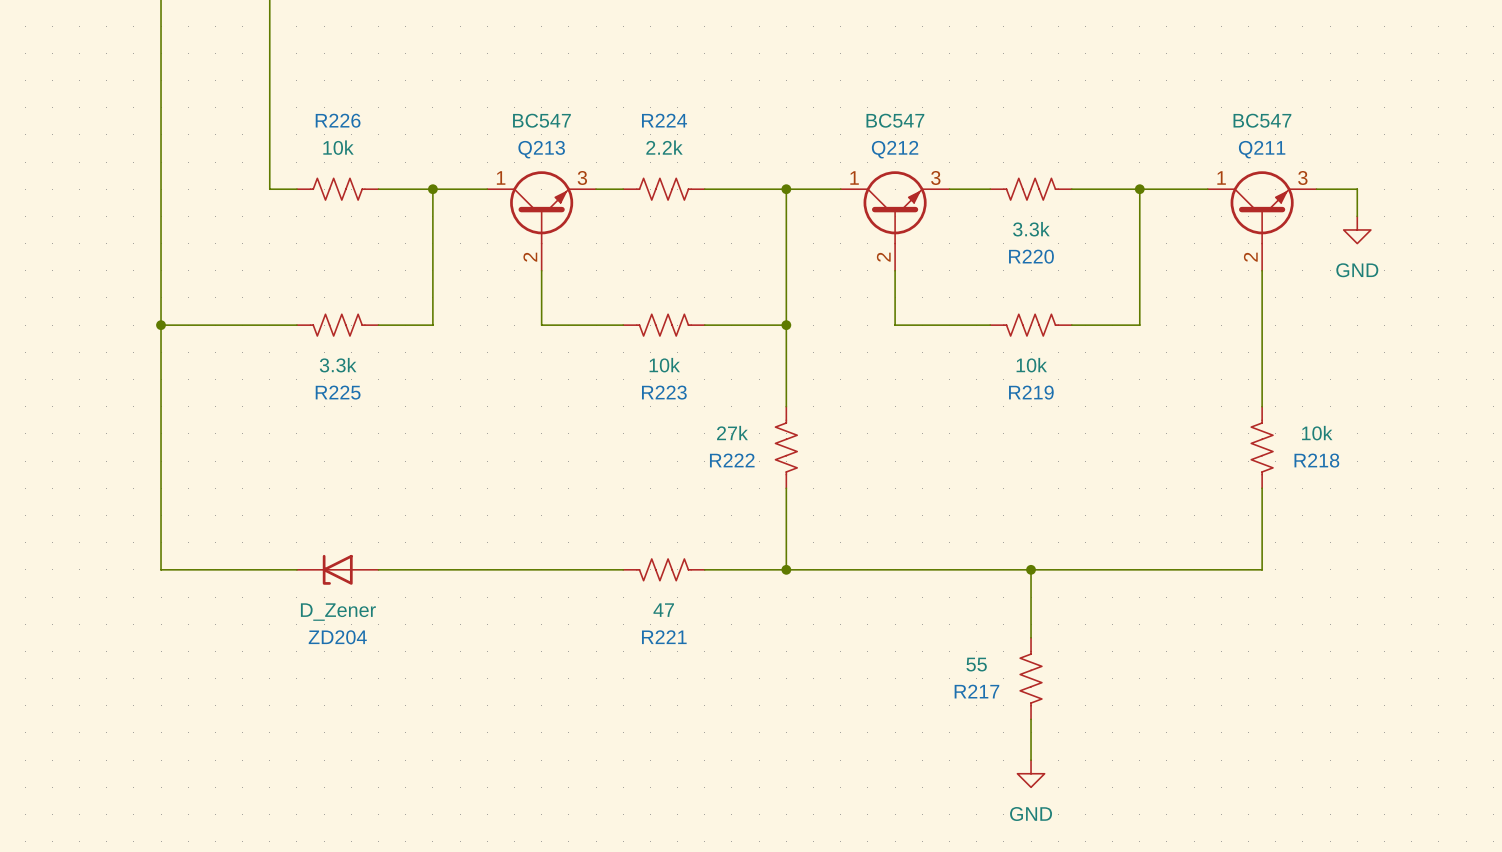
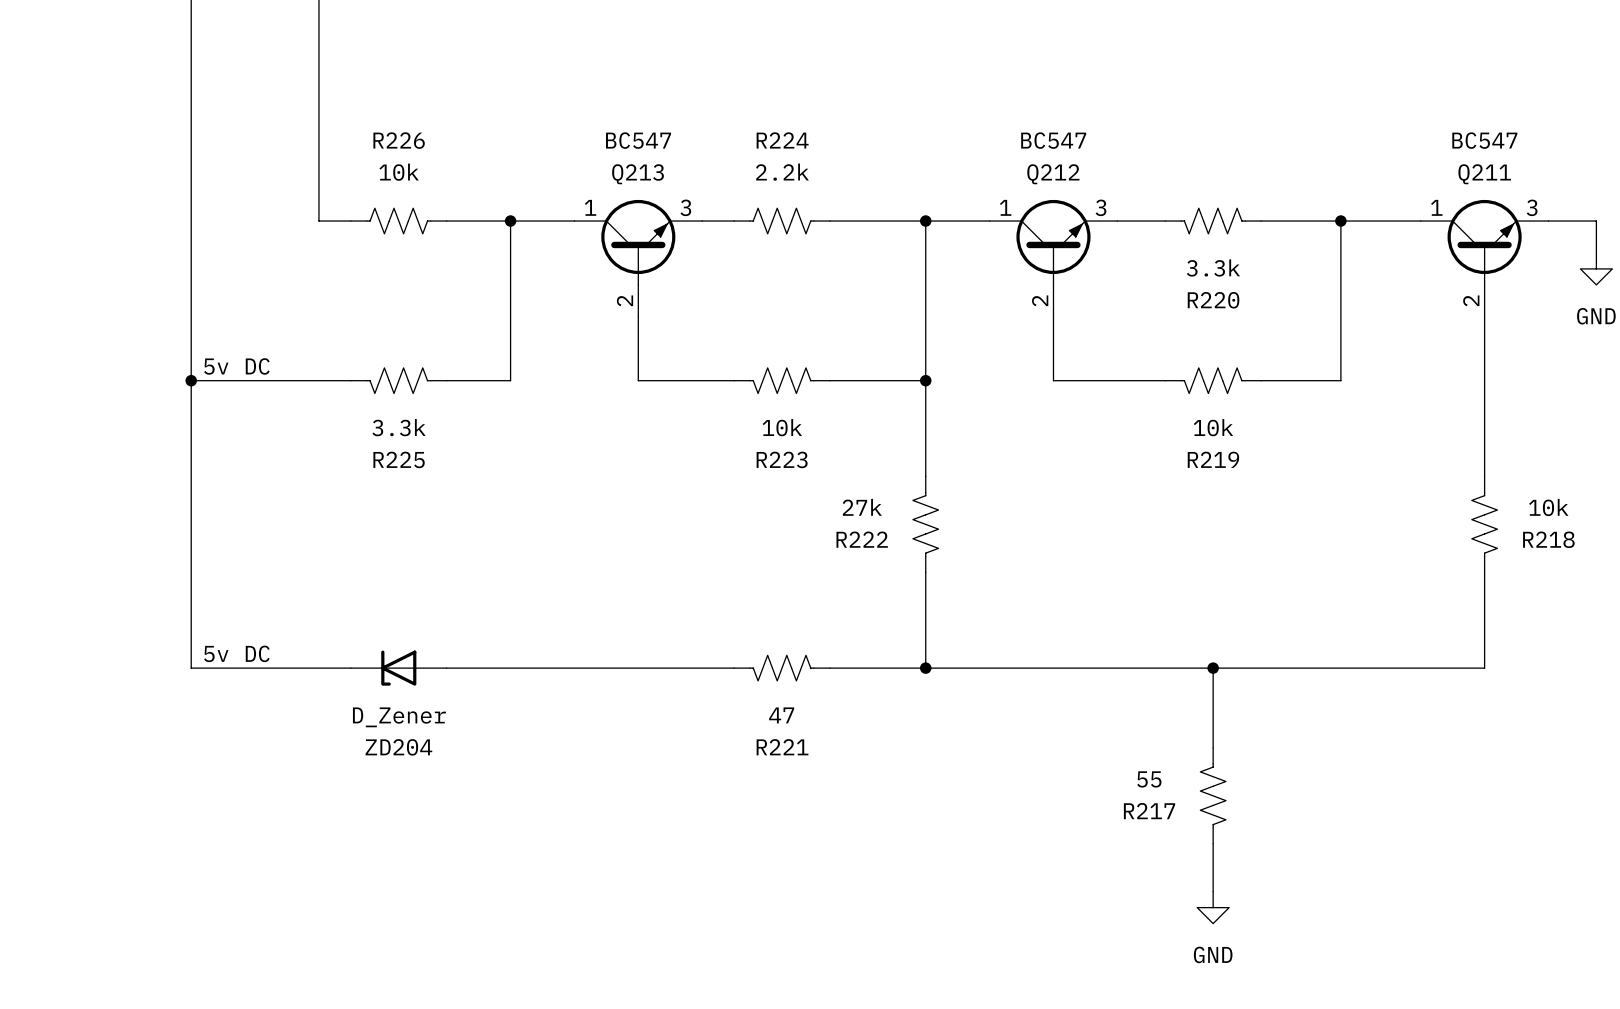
label: none -> 5v DC (236, 366)
label: none -> 5v DC (236, 653)

